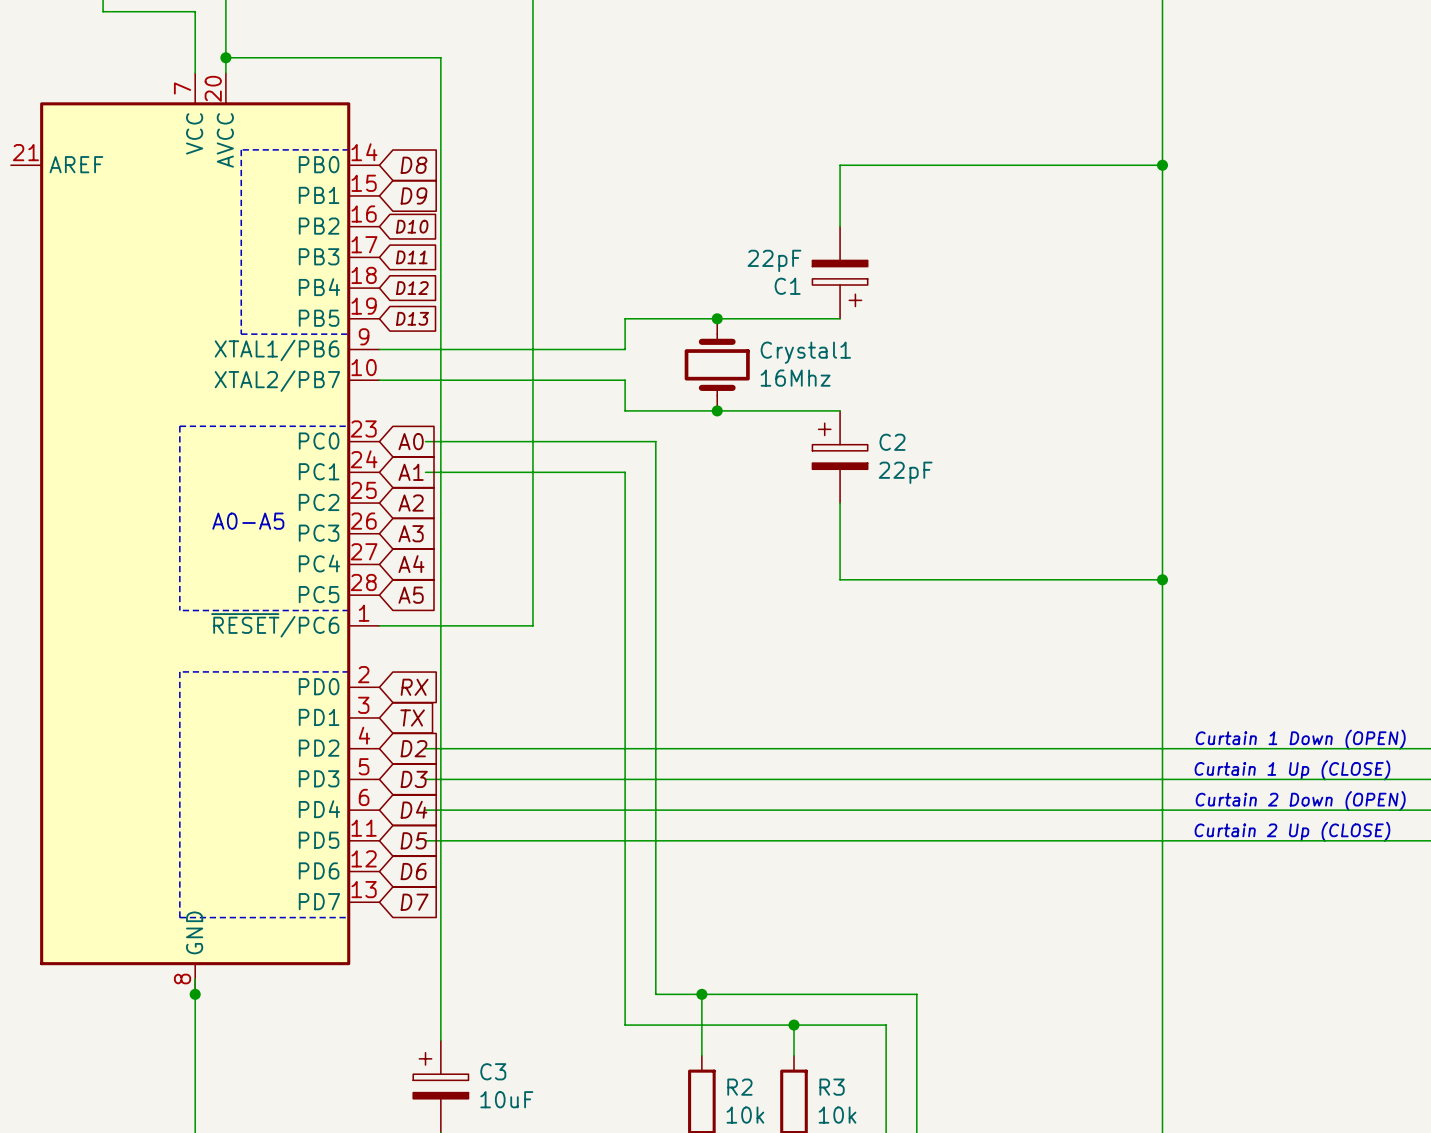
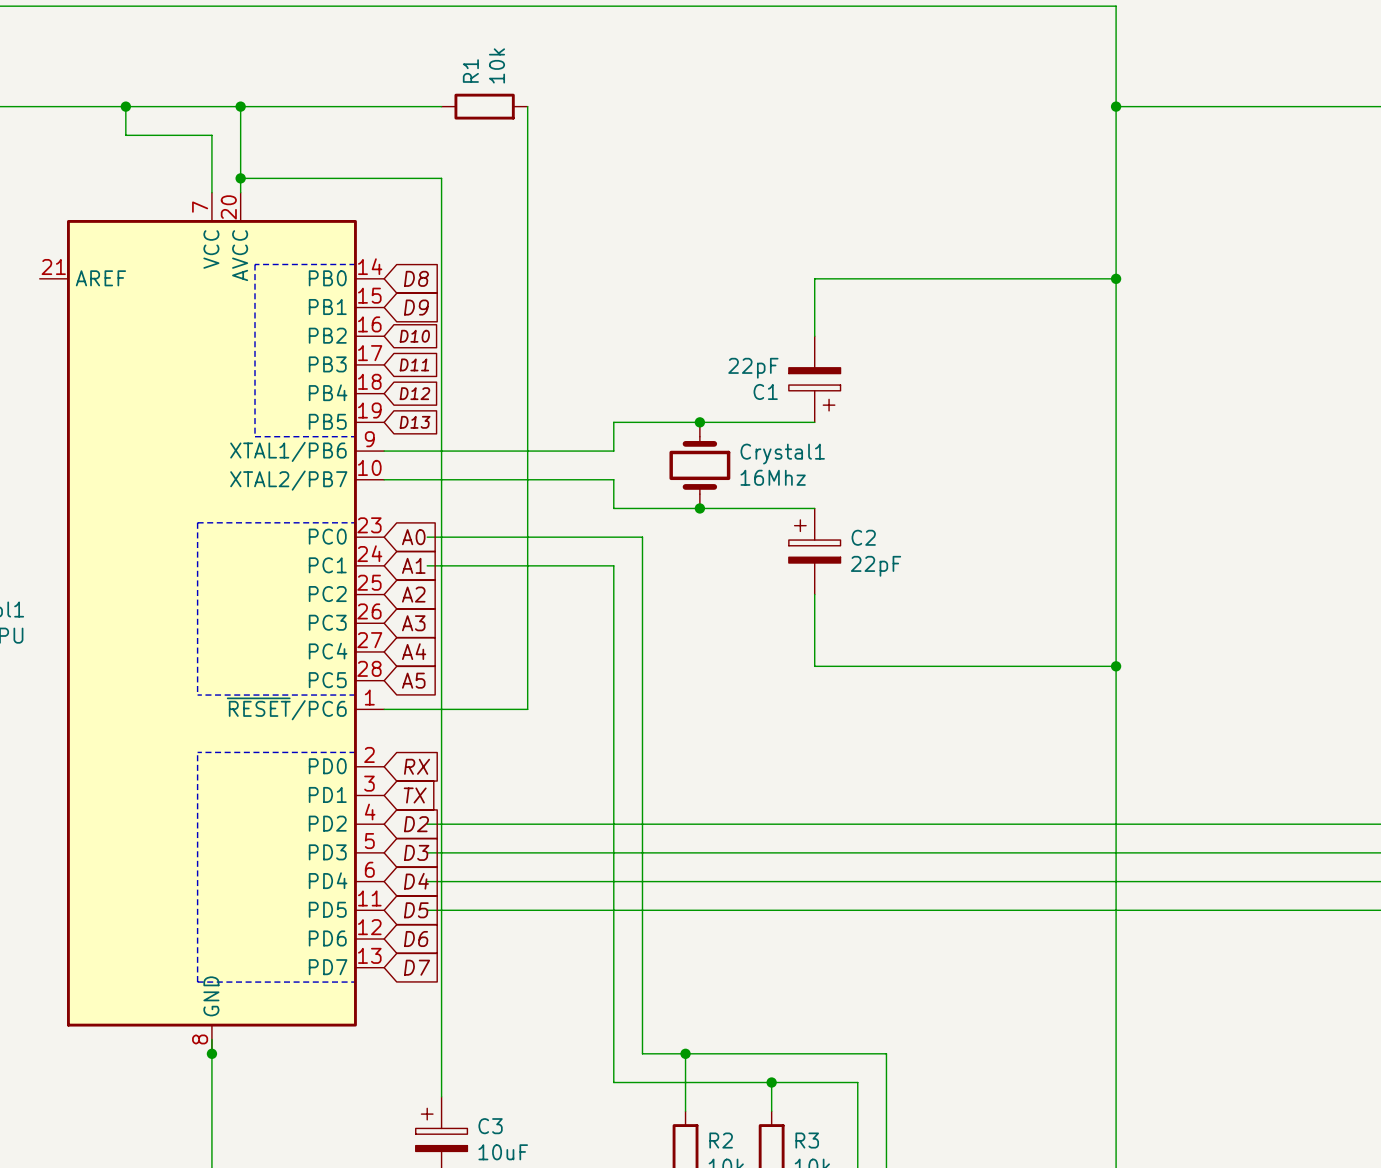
text: A0-A5 (248, 521) -> none
text: Curtain 1 Down (OPEN) (1300, 739) -> none
text: Curtain 1 Up (CLOSE) (1292, 770) -> none
text: Curtain 2 Down (OPEN) (1300, 801) -> none
text: Curtain 2 Up (CLOSE) (1292, 831) -> none

